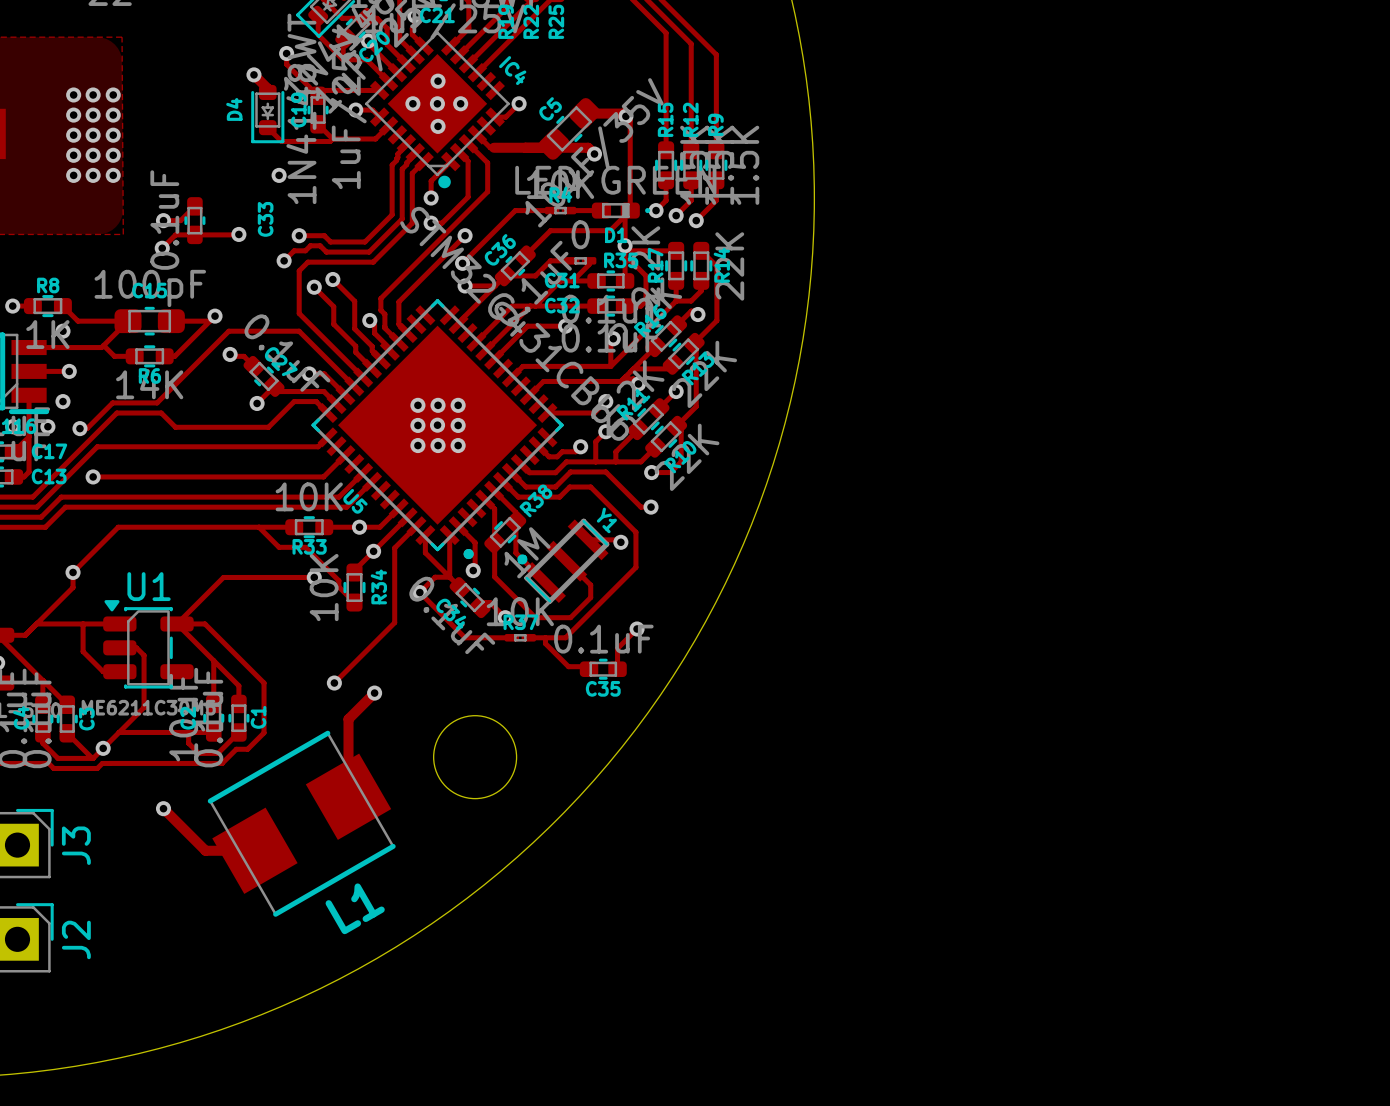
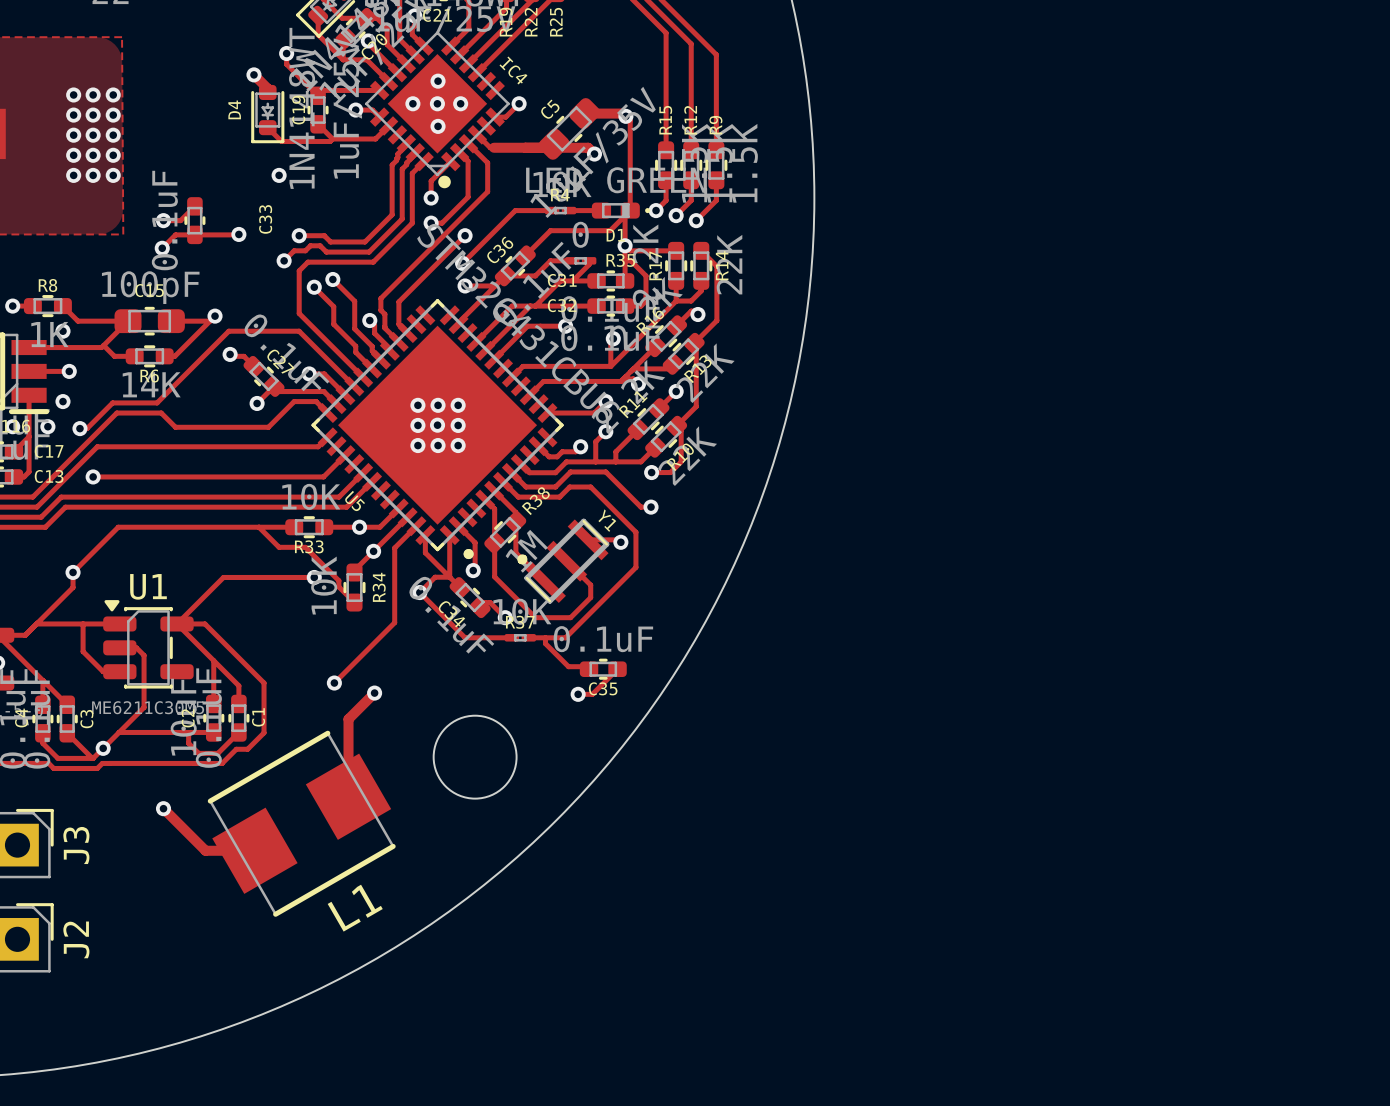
track: (637, 628) (617, 648) (617, 669) -> (578, 694) (592, 694) (617, 669)
via position: (637, 628) -> (578, 694)

